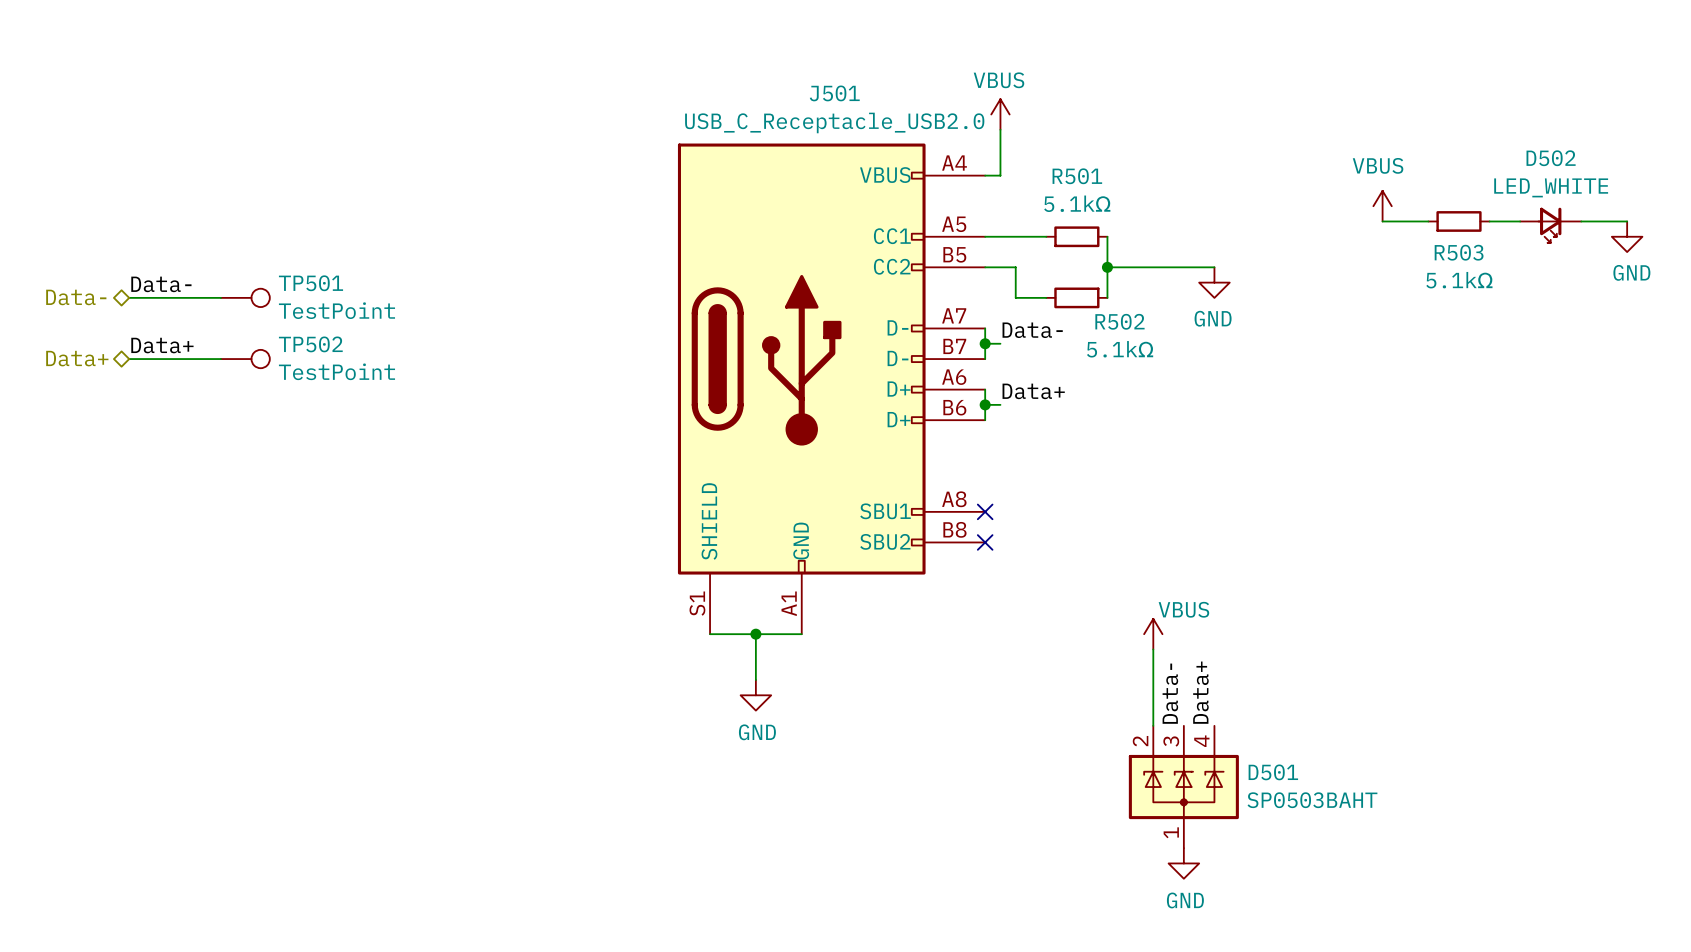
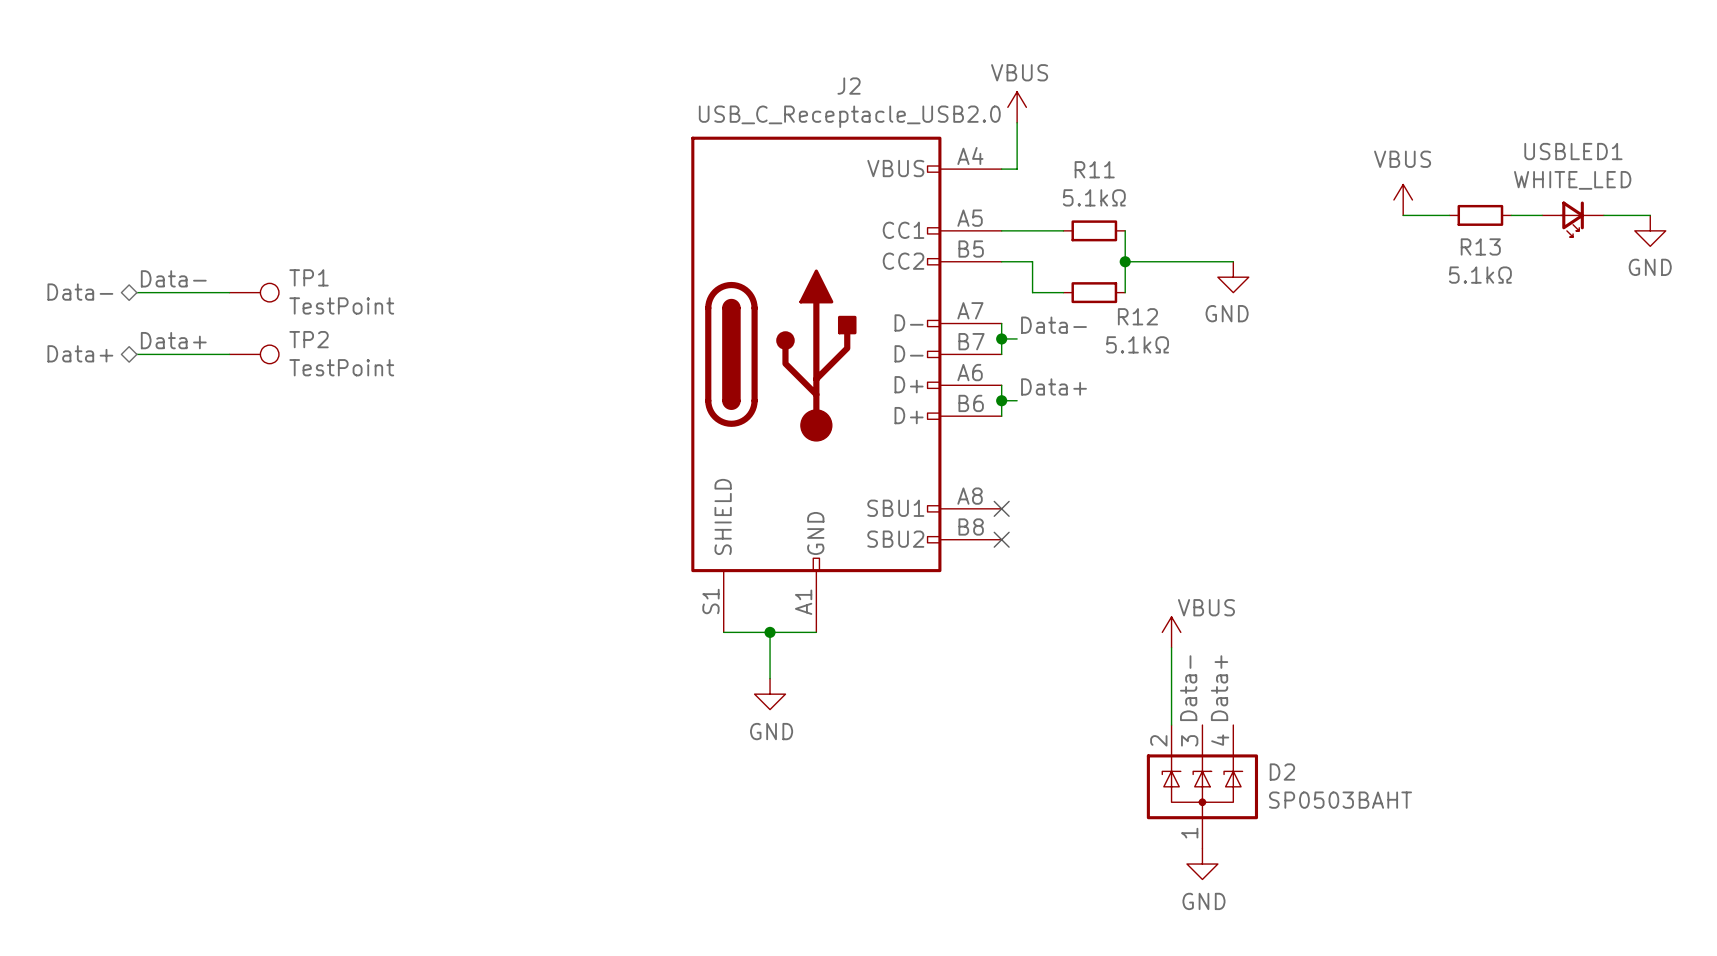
J501 name: J501 (834, 93) -> J2 (849, 86)
D502 name: D502 (1551, 158) -> USBLED1 (1573, 151)
R501 name: R501 (1077, 176) -> R11 (1094, 169)
D502 value: LED_WHITE (1551, 187) -> WHITE_LED (1572, 180)
R503 name: R503 (1459, 252) -> R13 (1480, 246)
TP501 name: TP501 (311, 283) -> TP1 (309, 277)
R502 name: R502 (1119, 321) -> R12 (1137, 316)
TP502 name: TP502 (310, 344) -> TP2 (309, 339)
D501 name: D501 (1273, 772) -> D2 (1282, 772)

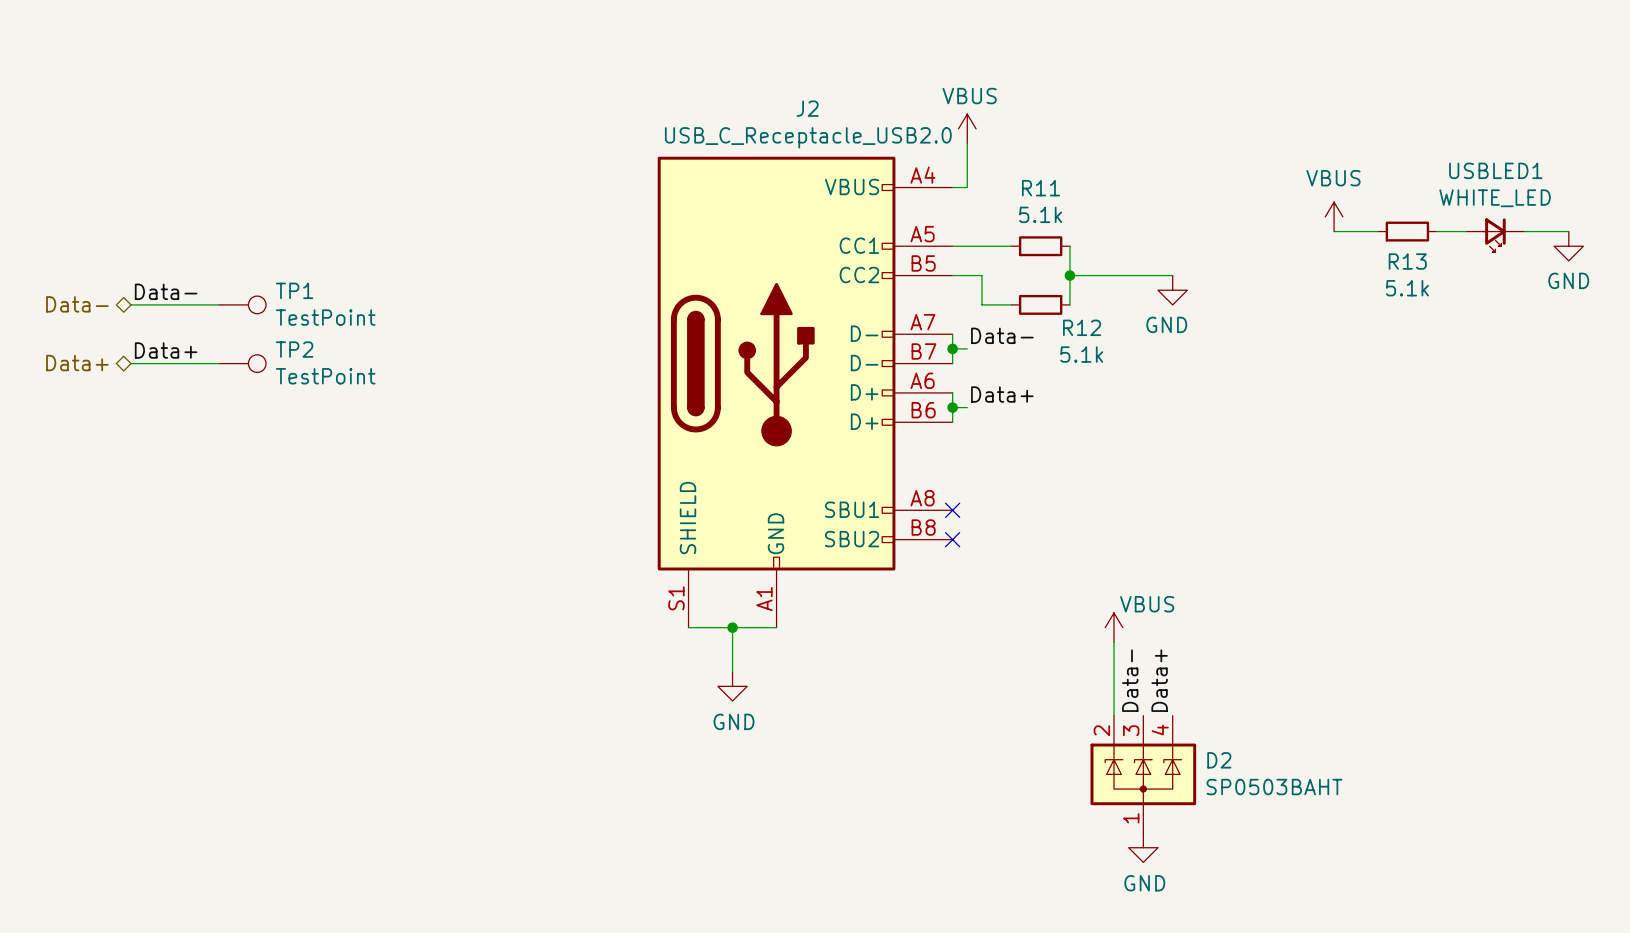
R11 value: 5.1kΩ (1094, 197) -> 5.1k (1040, 214)
R13 value: 5.1kΩ (1480, 275) -> 5.1k (1407, 288)
R12 value: 5.1kΩ (1137, 344) -> 5.1k (1081, 354)

